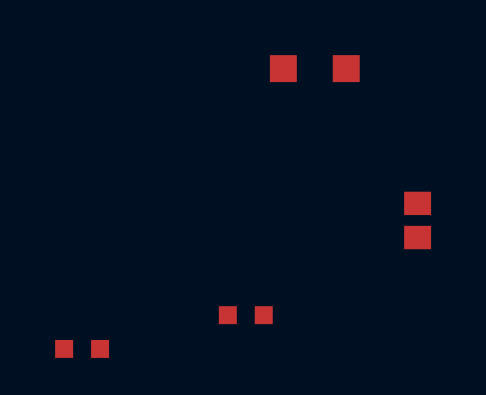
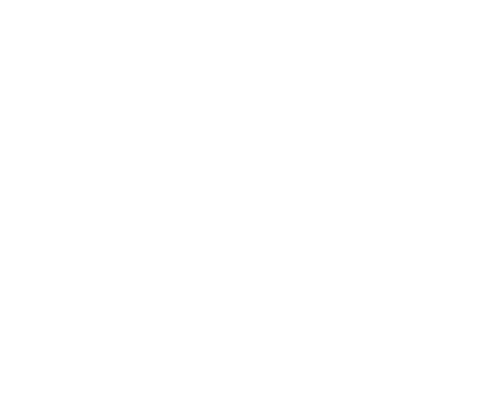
part: (314, 68) -> none
part: (417, 220) -> none
part: (245, 315) -> none
part: (82, 348) -> none

